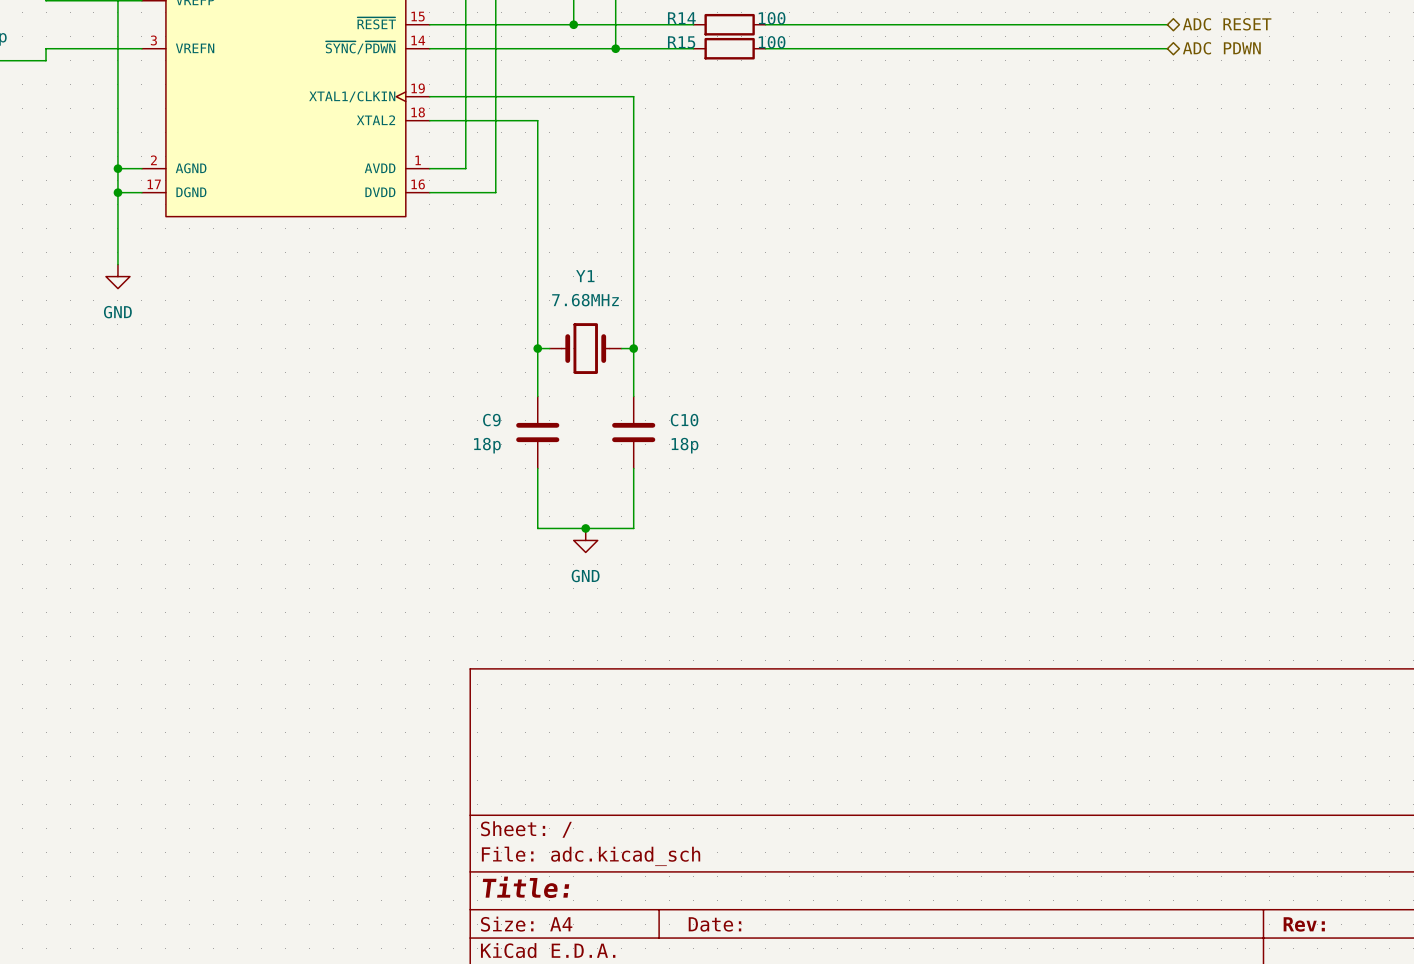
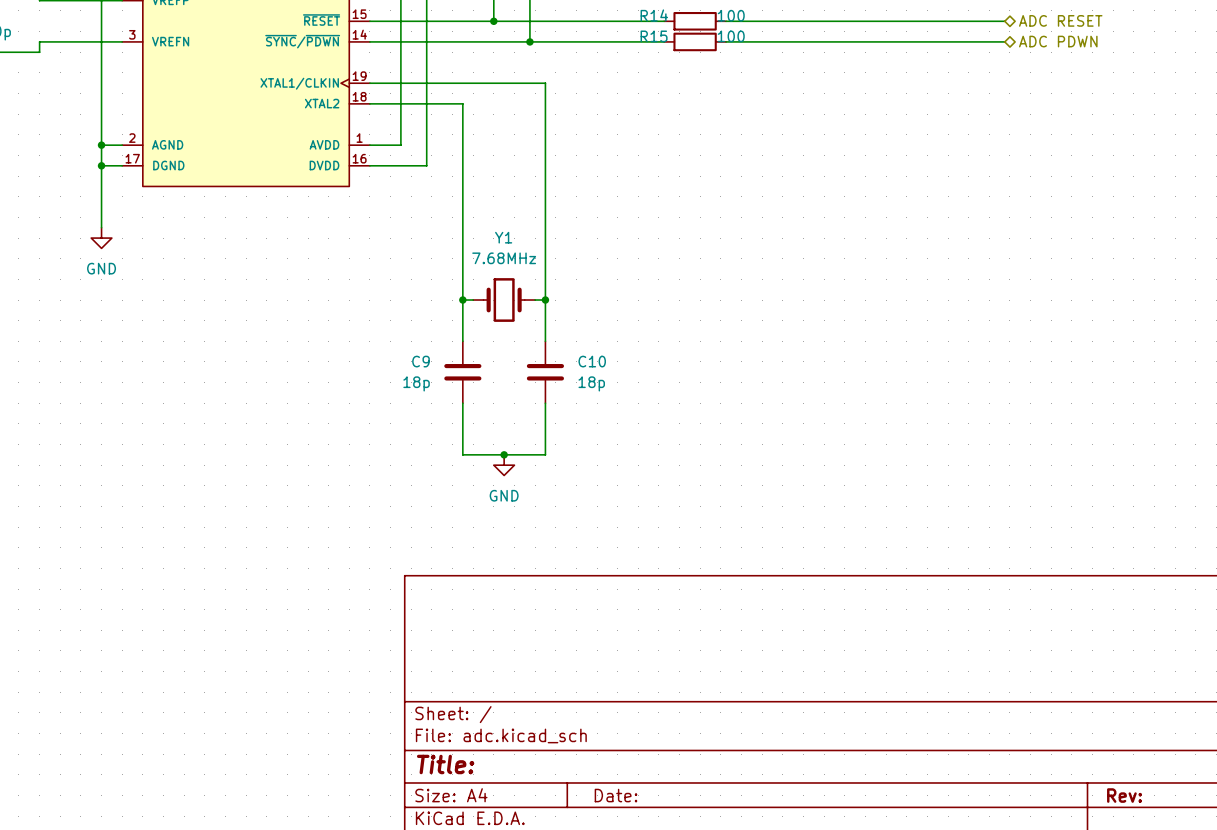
R14 position: (729, 24) -> (695, 21)
wire: (771, 24) (843, 24) -> (597, 21) (658, 21)
R15 position: (729, 48) -> (695, 41)
wire: (771, 48) (843, 48) -> (597, 41) (658, 41)

